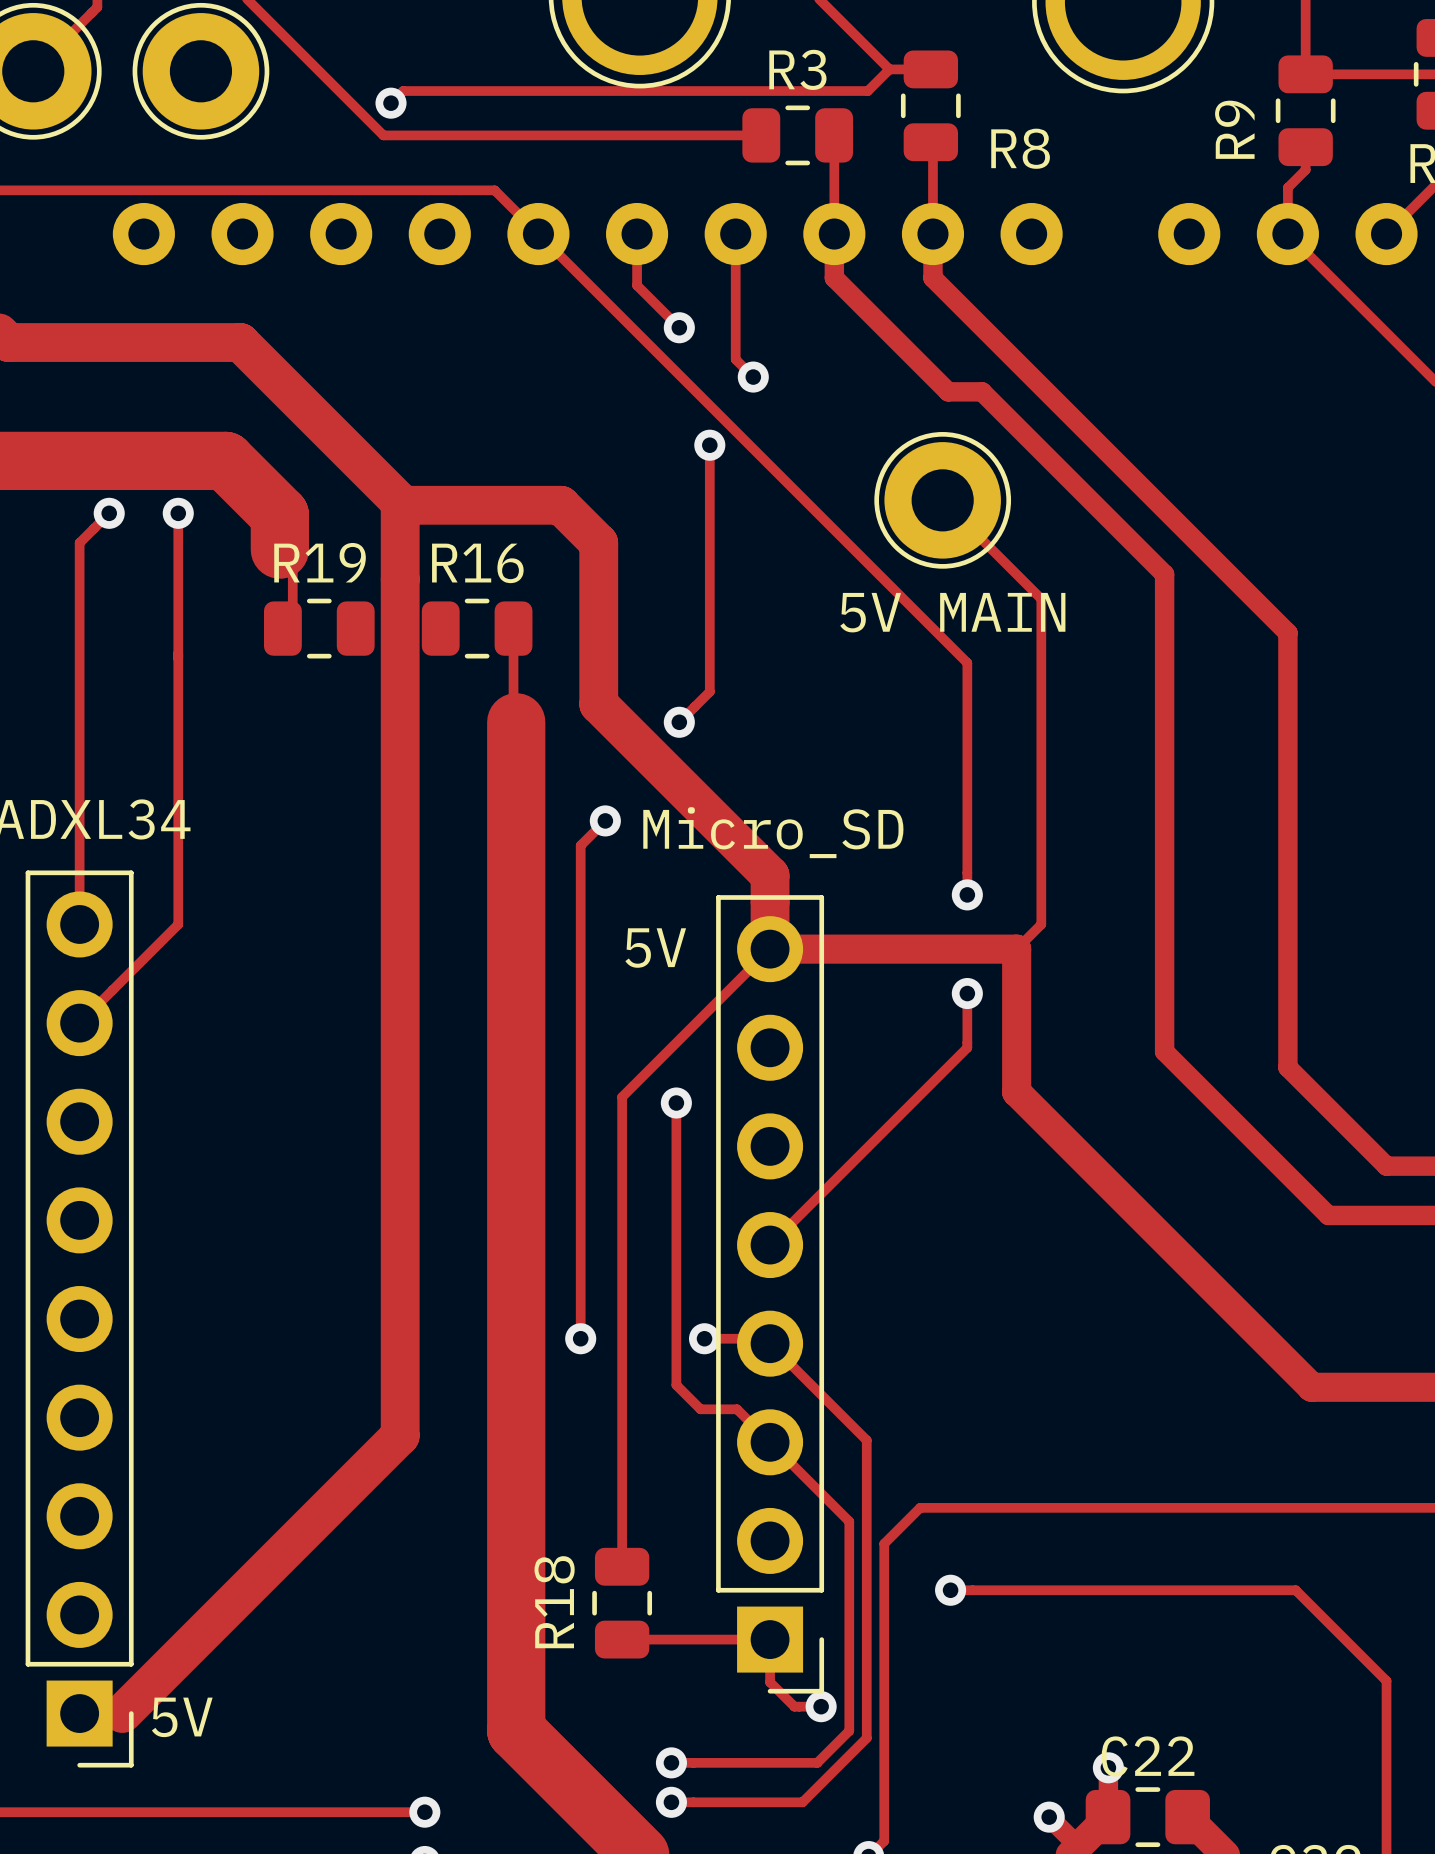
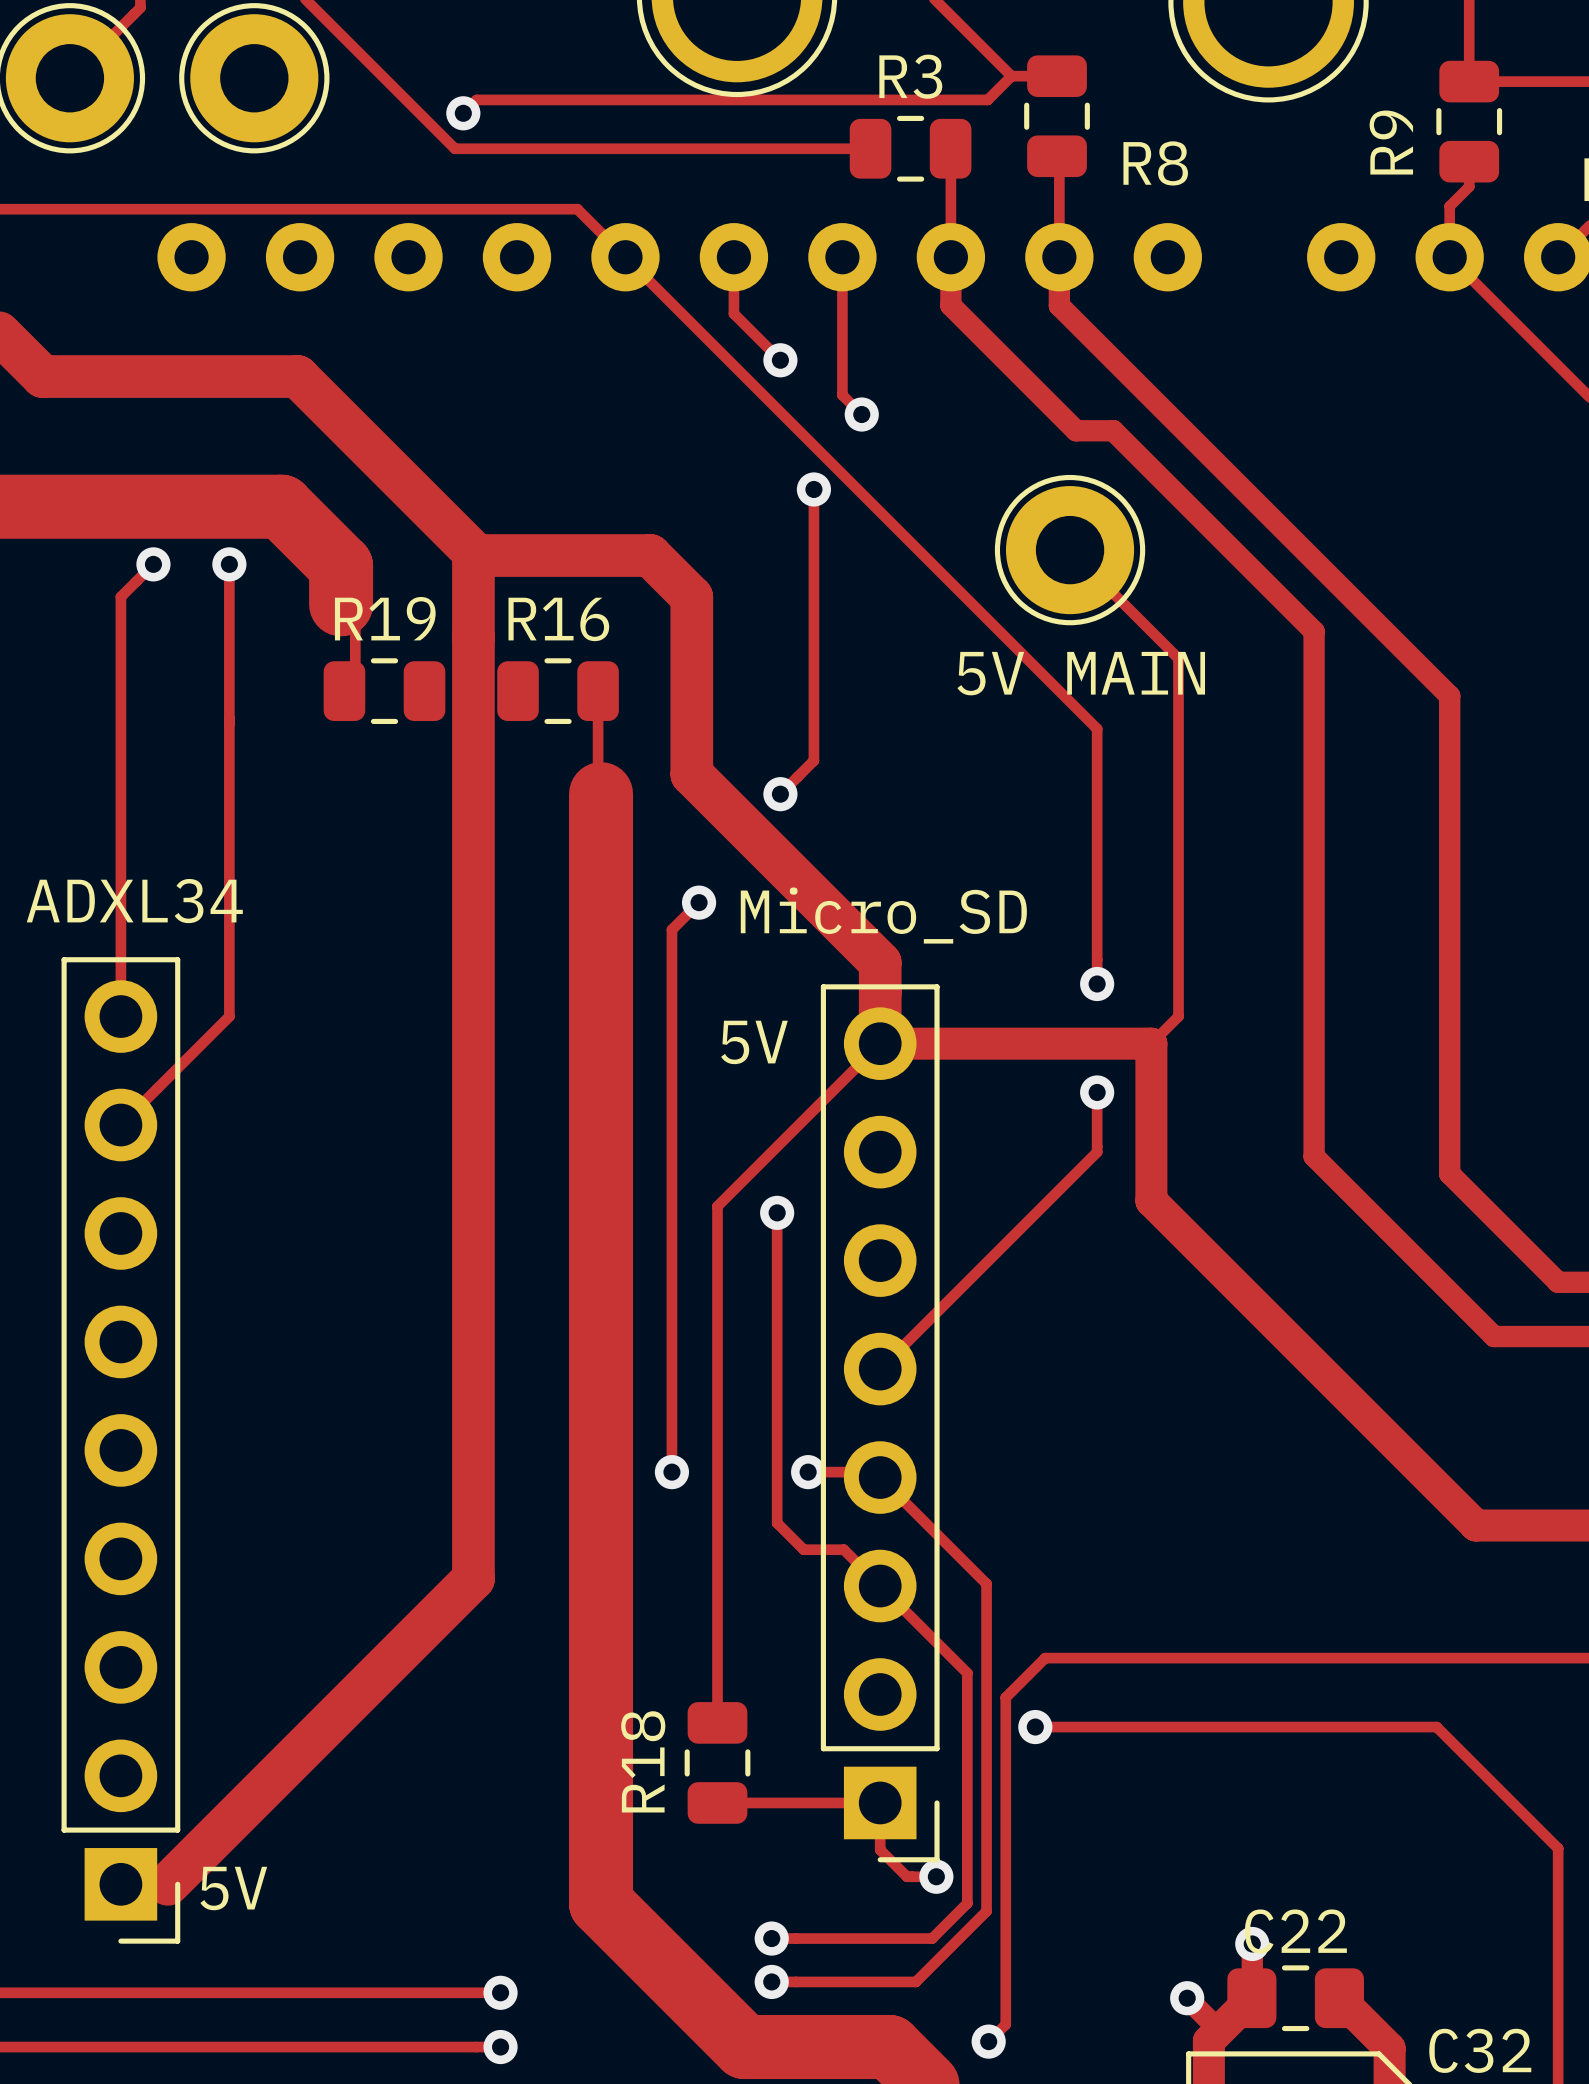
track: (950, 1590) (1295, 1590) -> (1035, 1727) (1436, 1727) (1458, 1748)
via position: (950, 1590) -> (1035, 1727)

